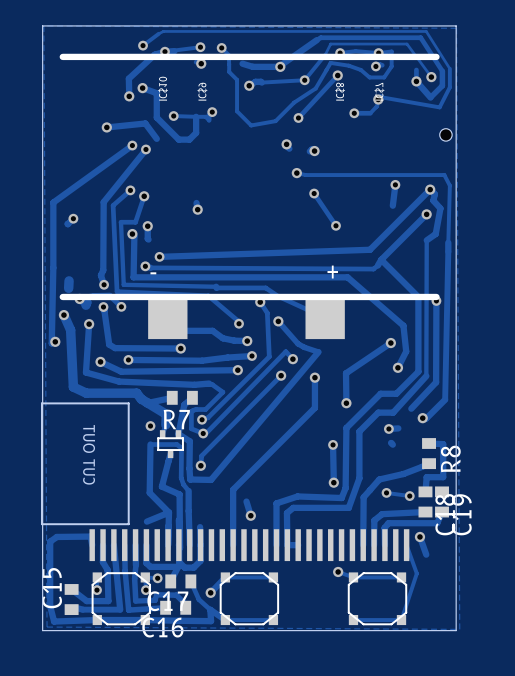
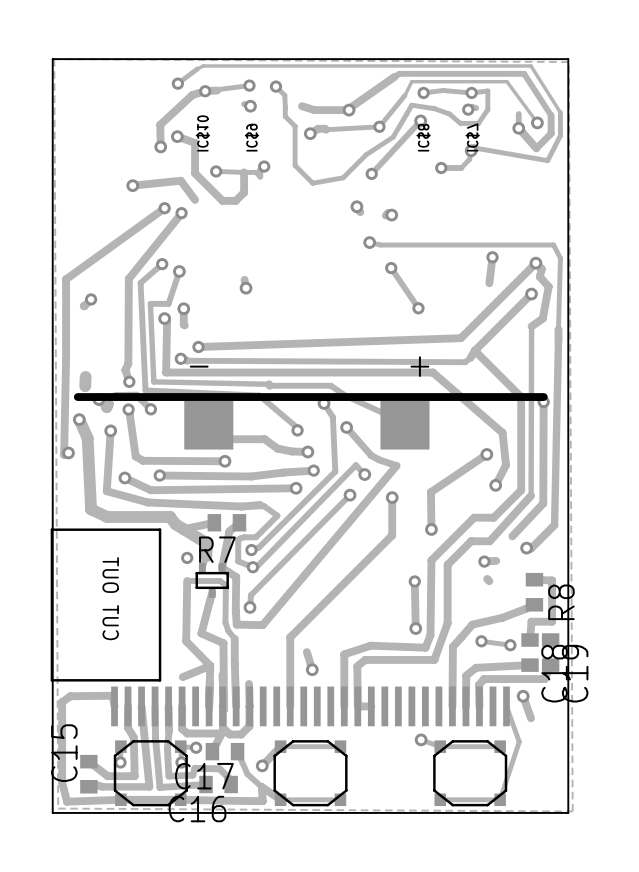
line: (436, 56) (62, 56) -> none
hole: (445, 134) -> none

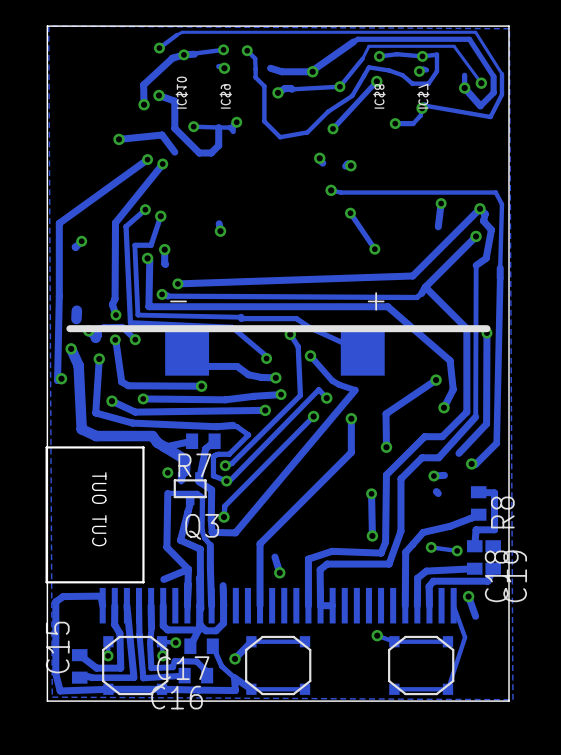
Q3: none -> (190, 488)
part: (212, 580) -> none

